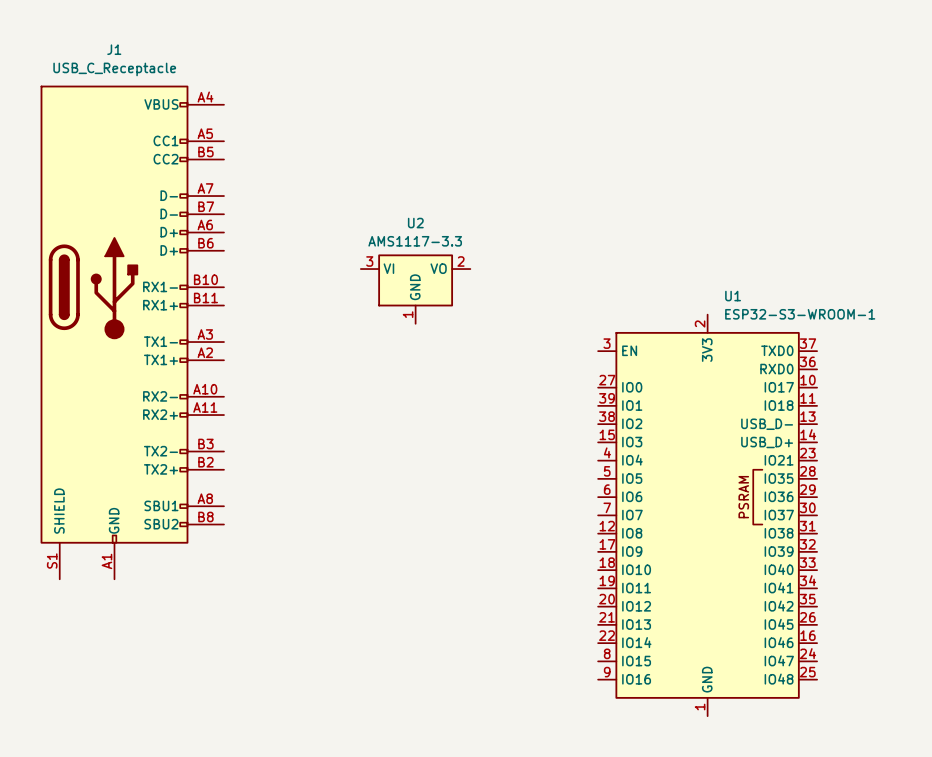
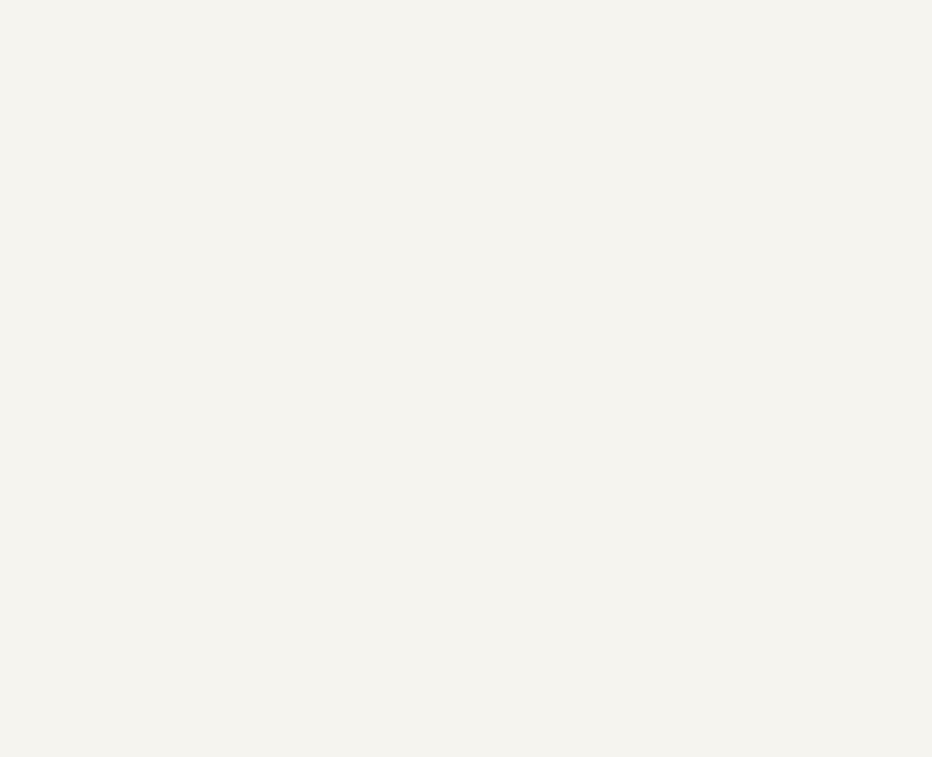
U2: AMS1117-3.3 (415, 289) -> none
J1: USB_C_Receptacle (132, 332) -> none
U1: ESP32-S3-WROOM-1 (707, 515) -> none

